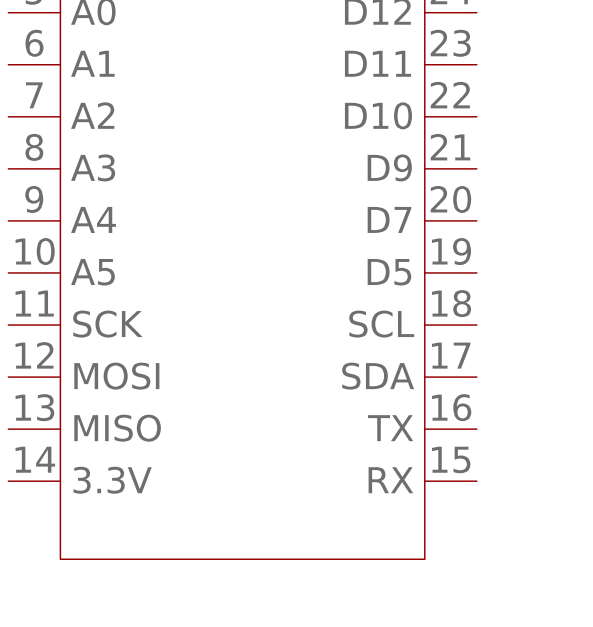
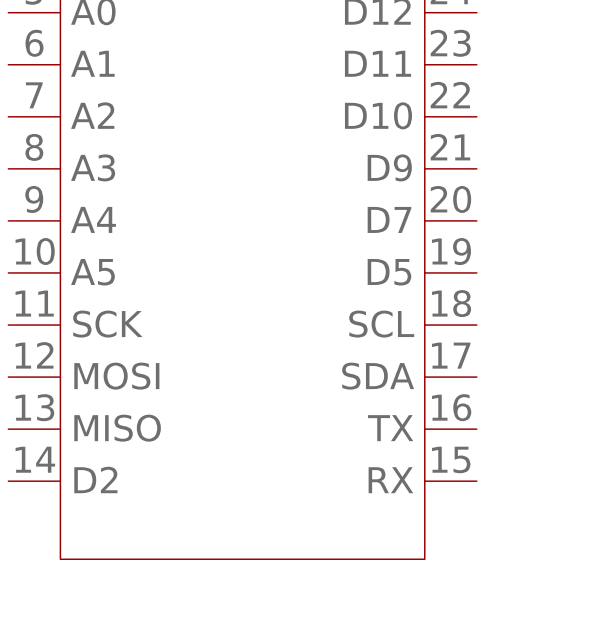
part pin name: 3.3V (112, 480) -> D2 (95, 479)

